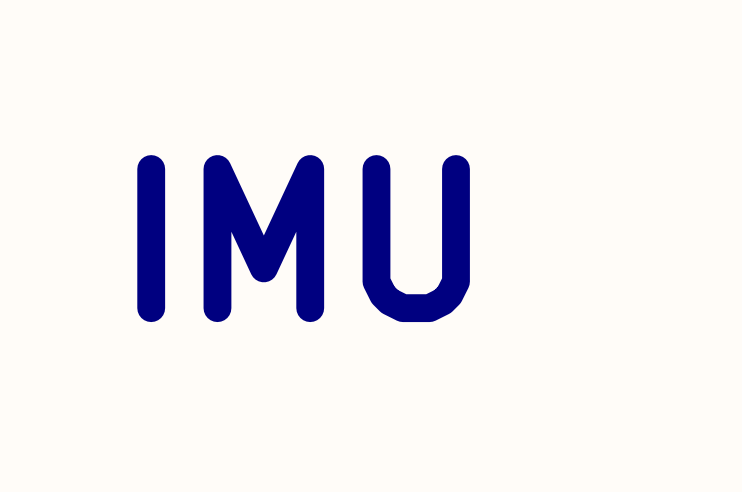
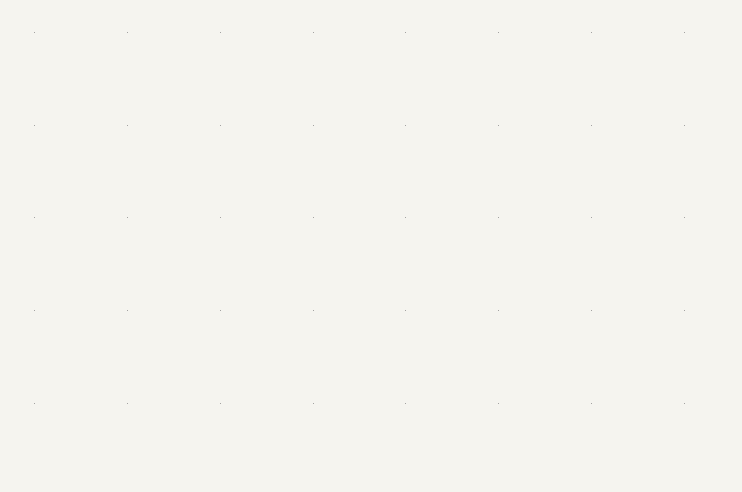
text: IMU (303, 238) -> none

